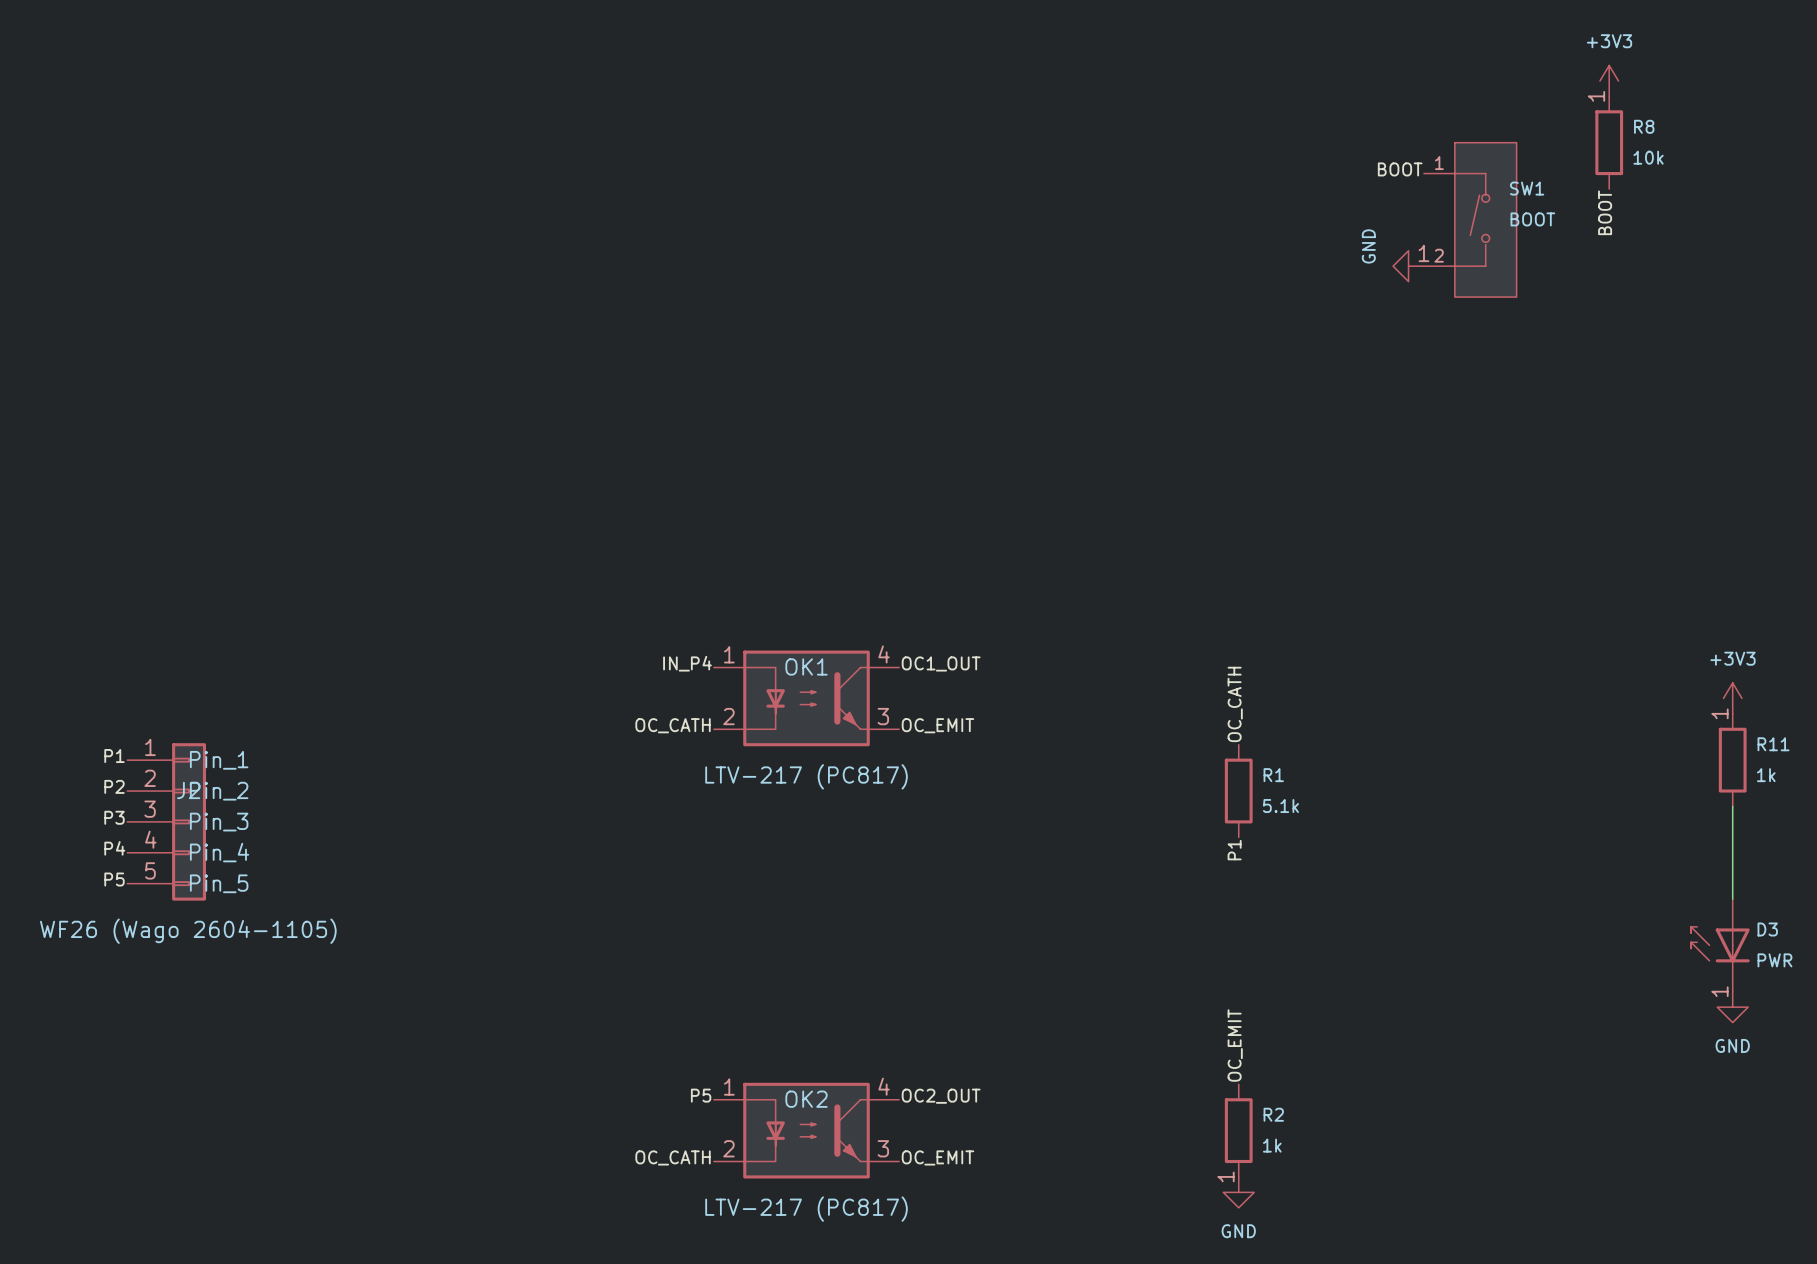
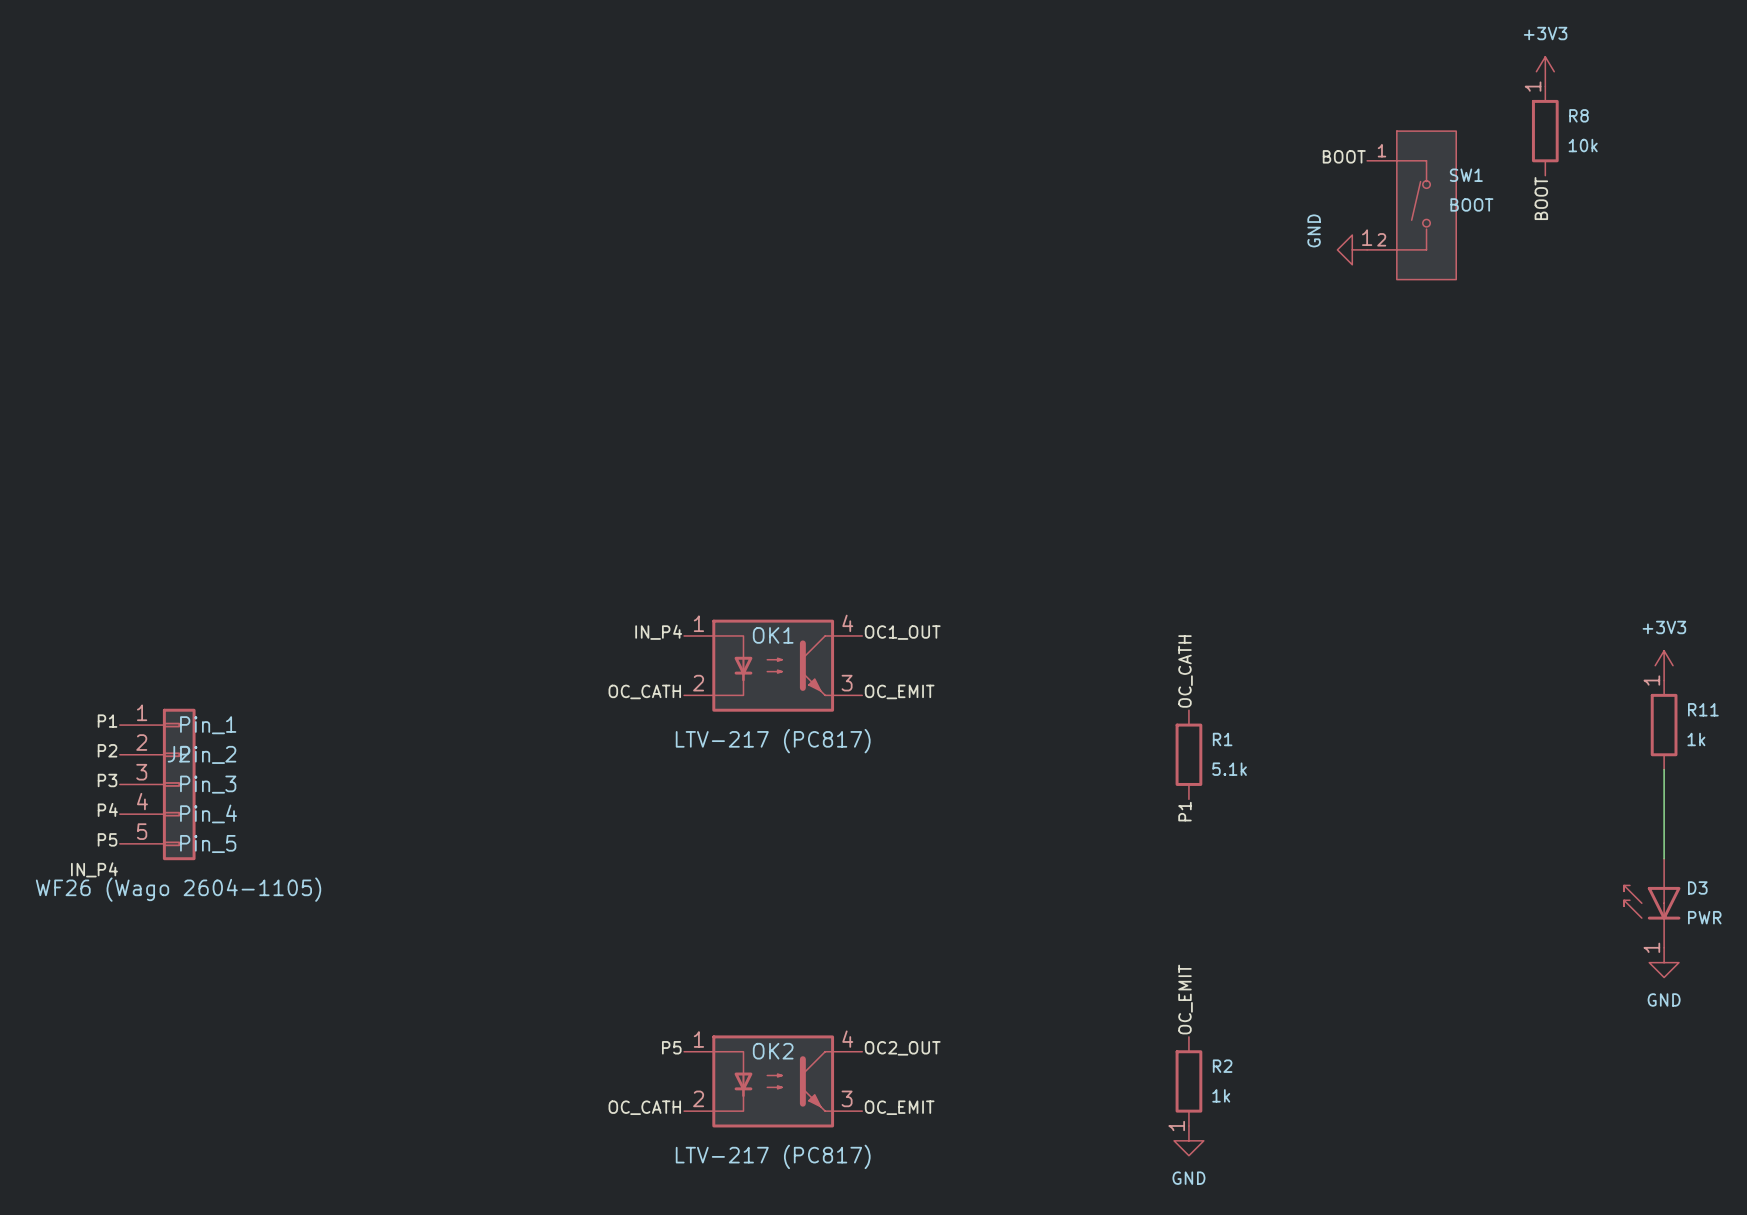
label: none -> IN_P4 (94, 869)

